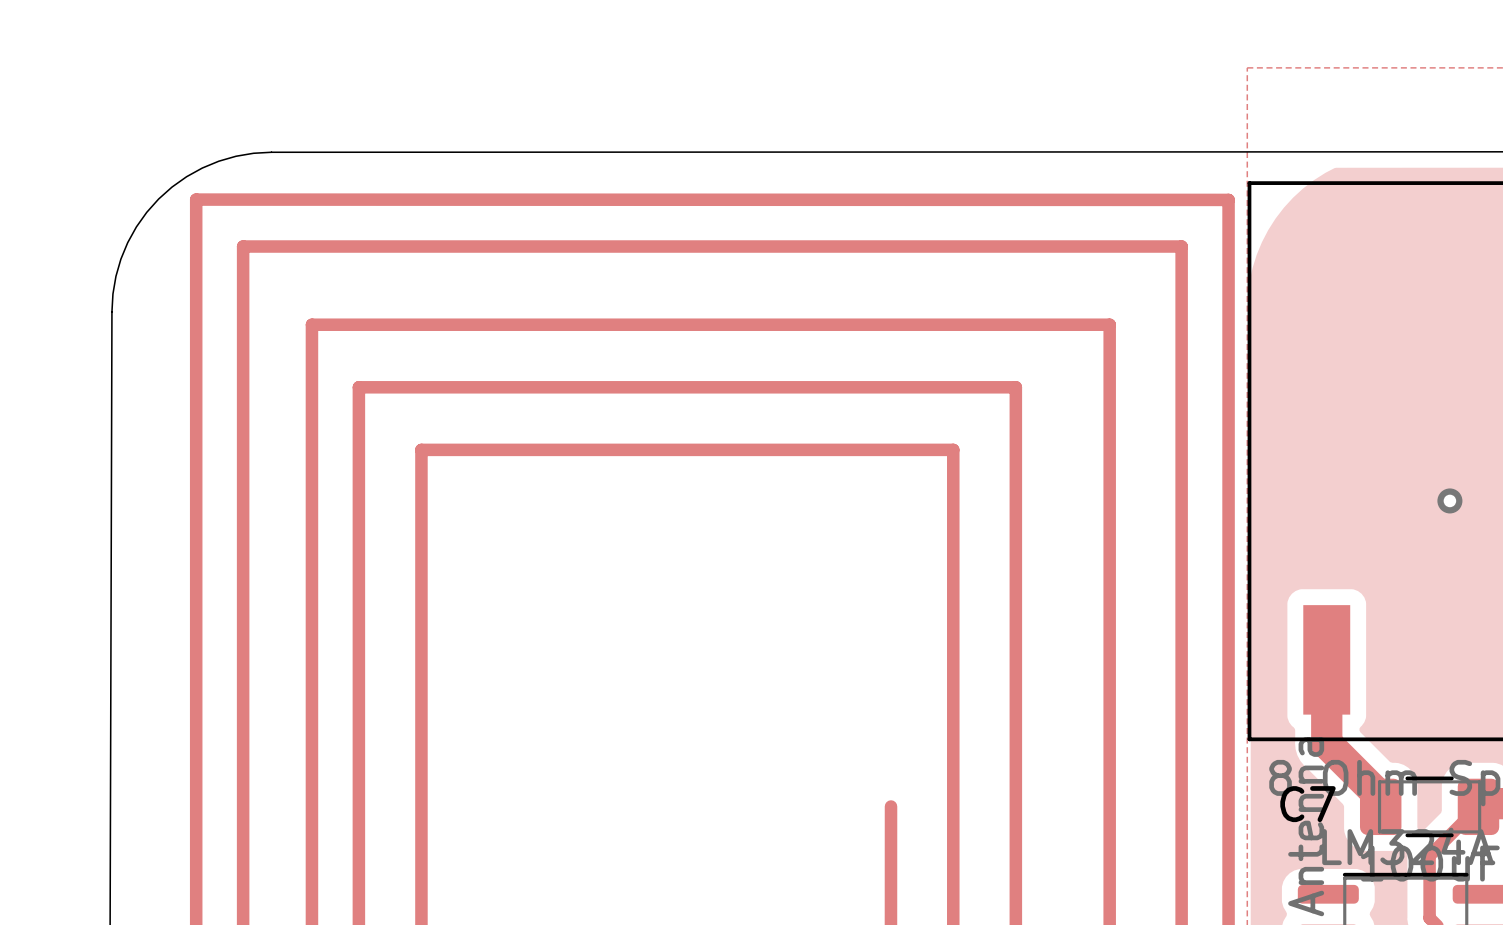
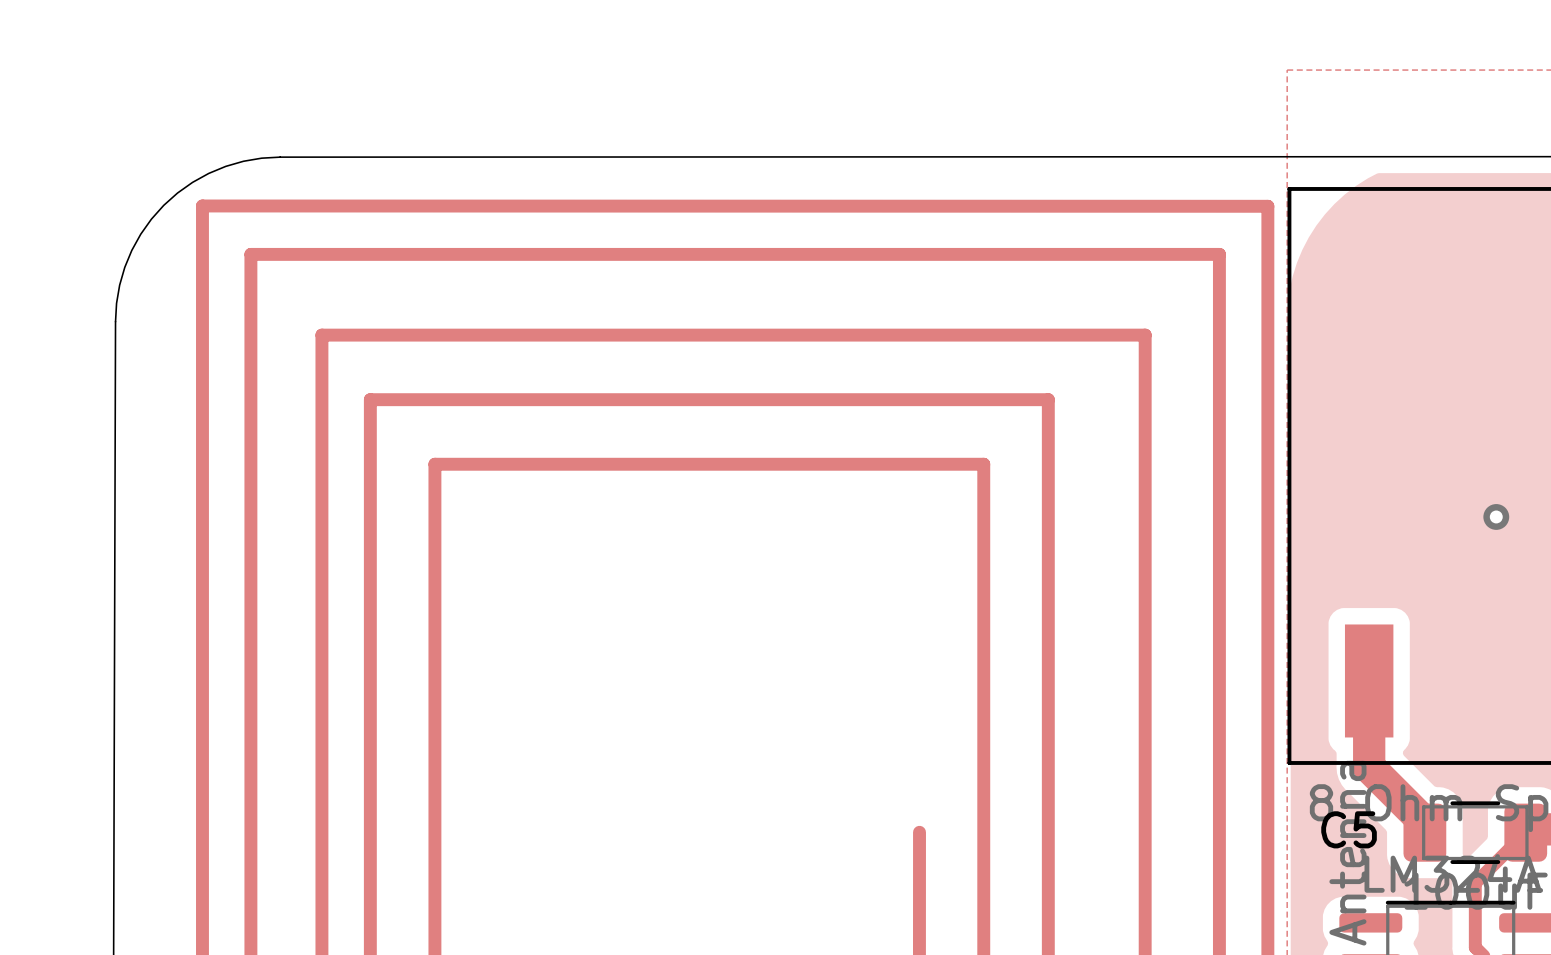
C7 name: C7 (1307, 804) -> C5 (1349, 829)

